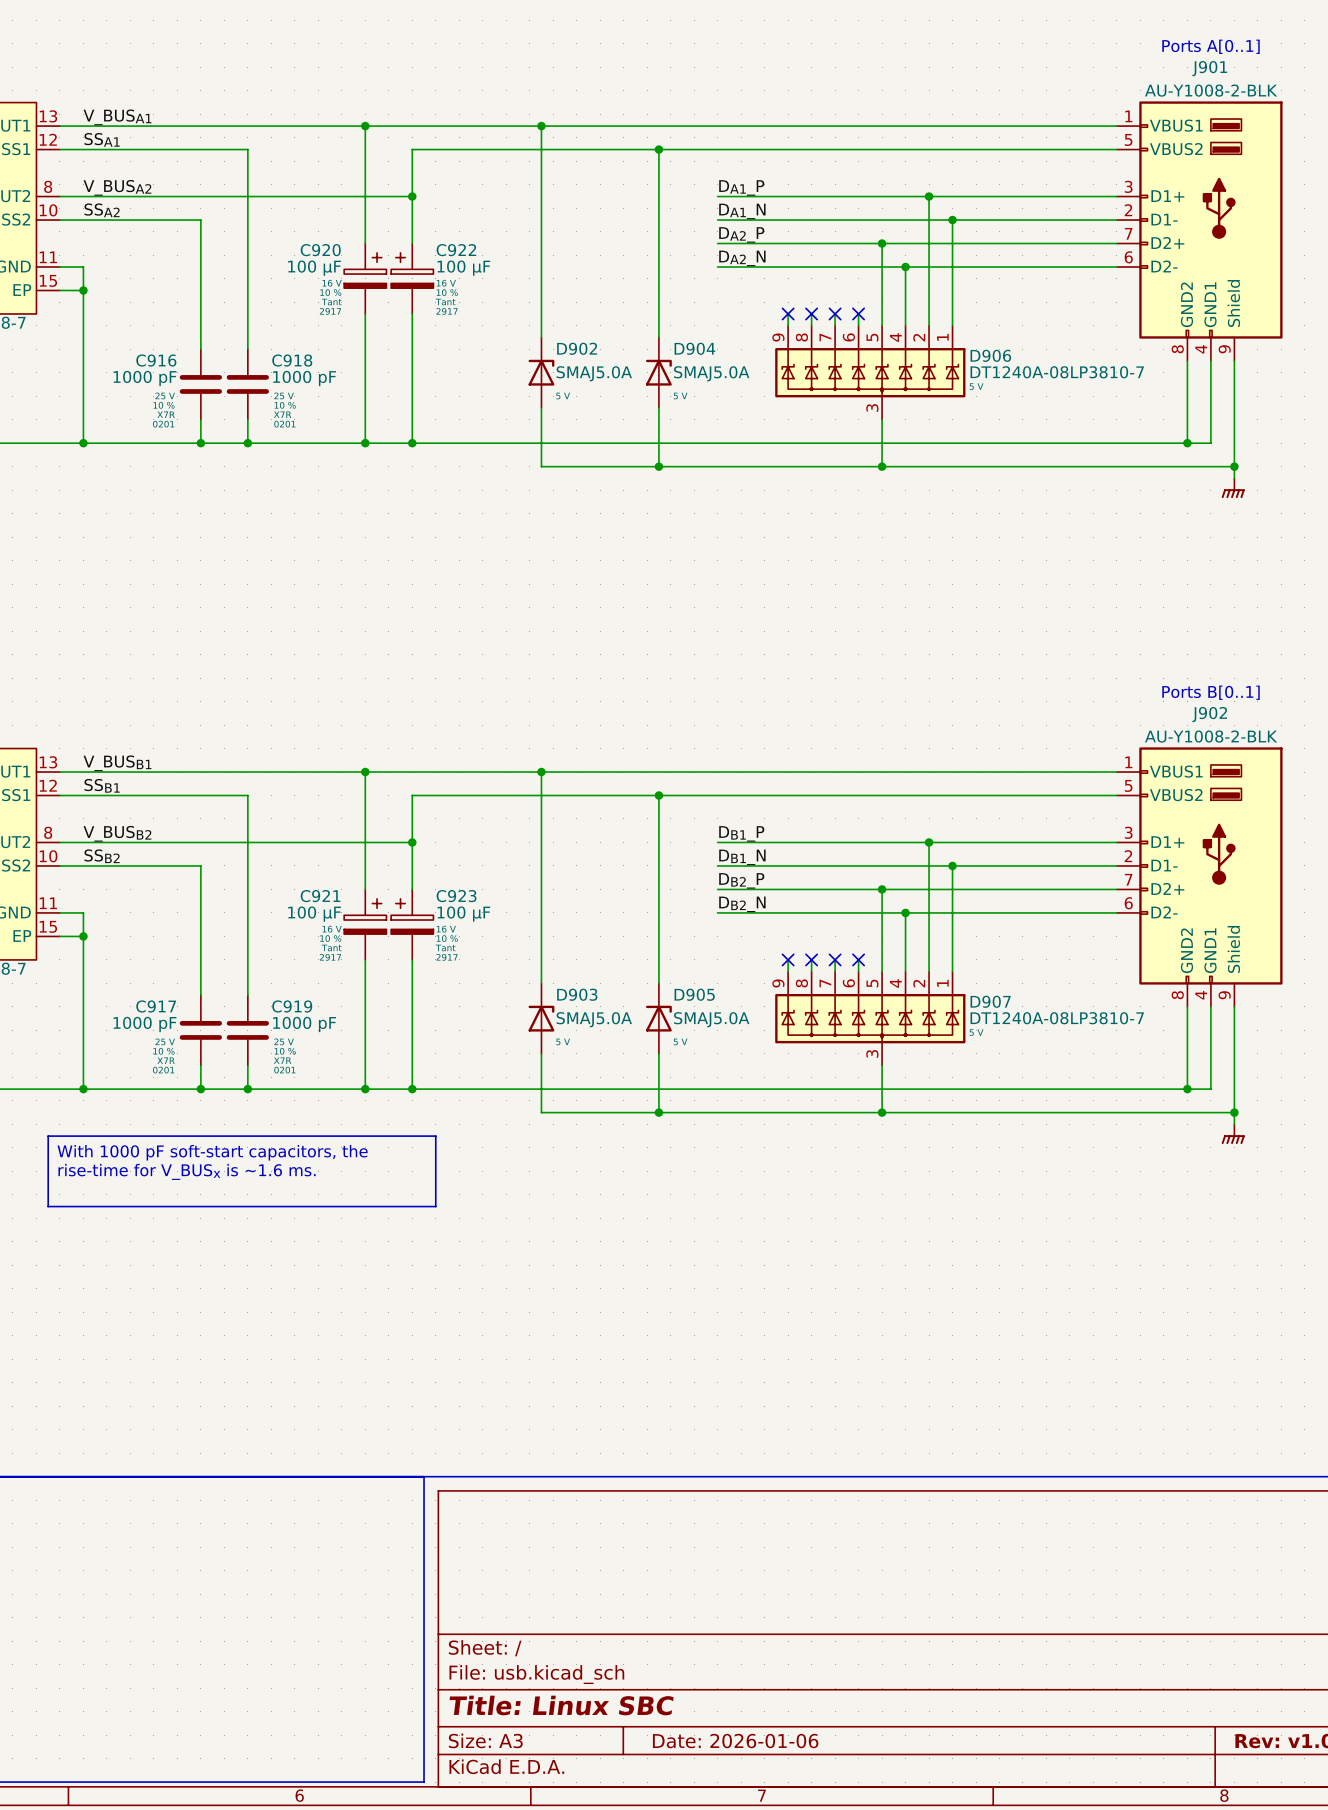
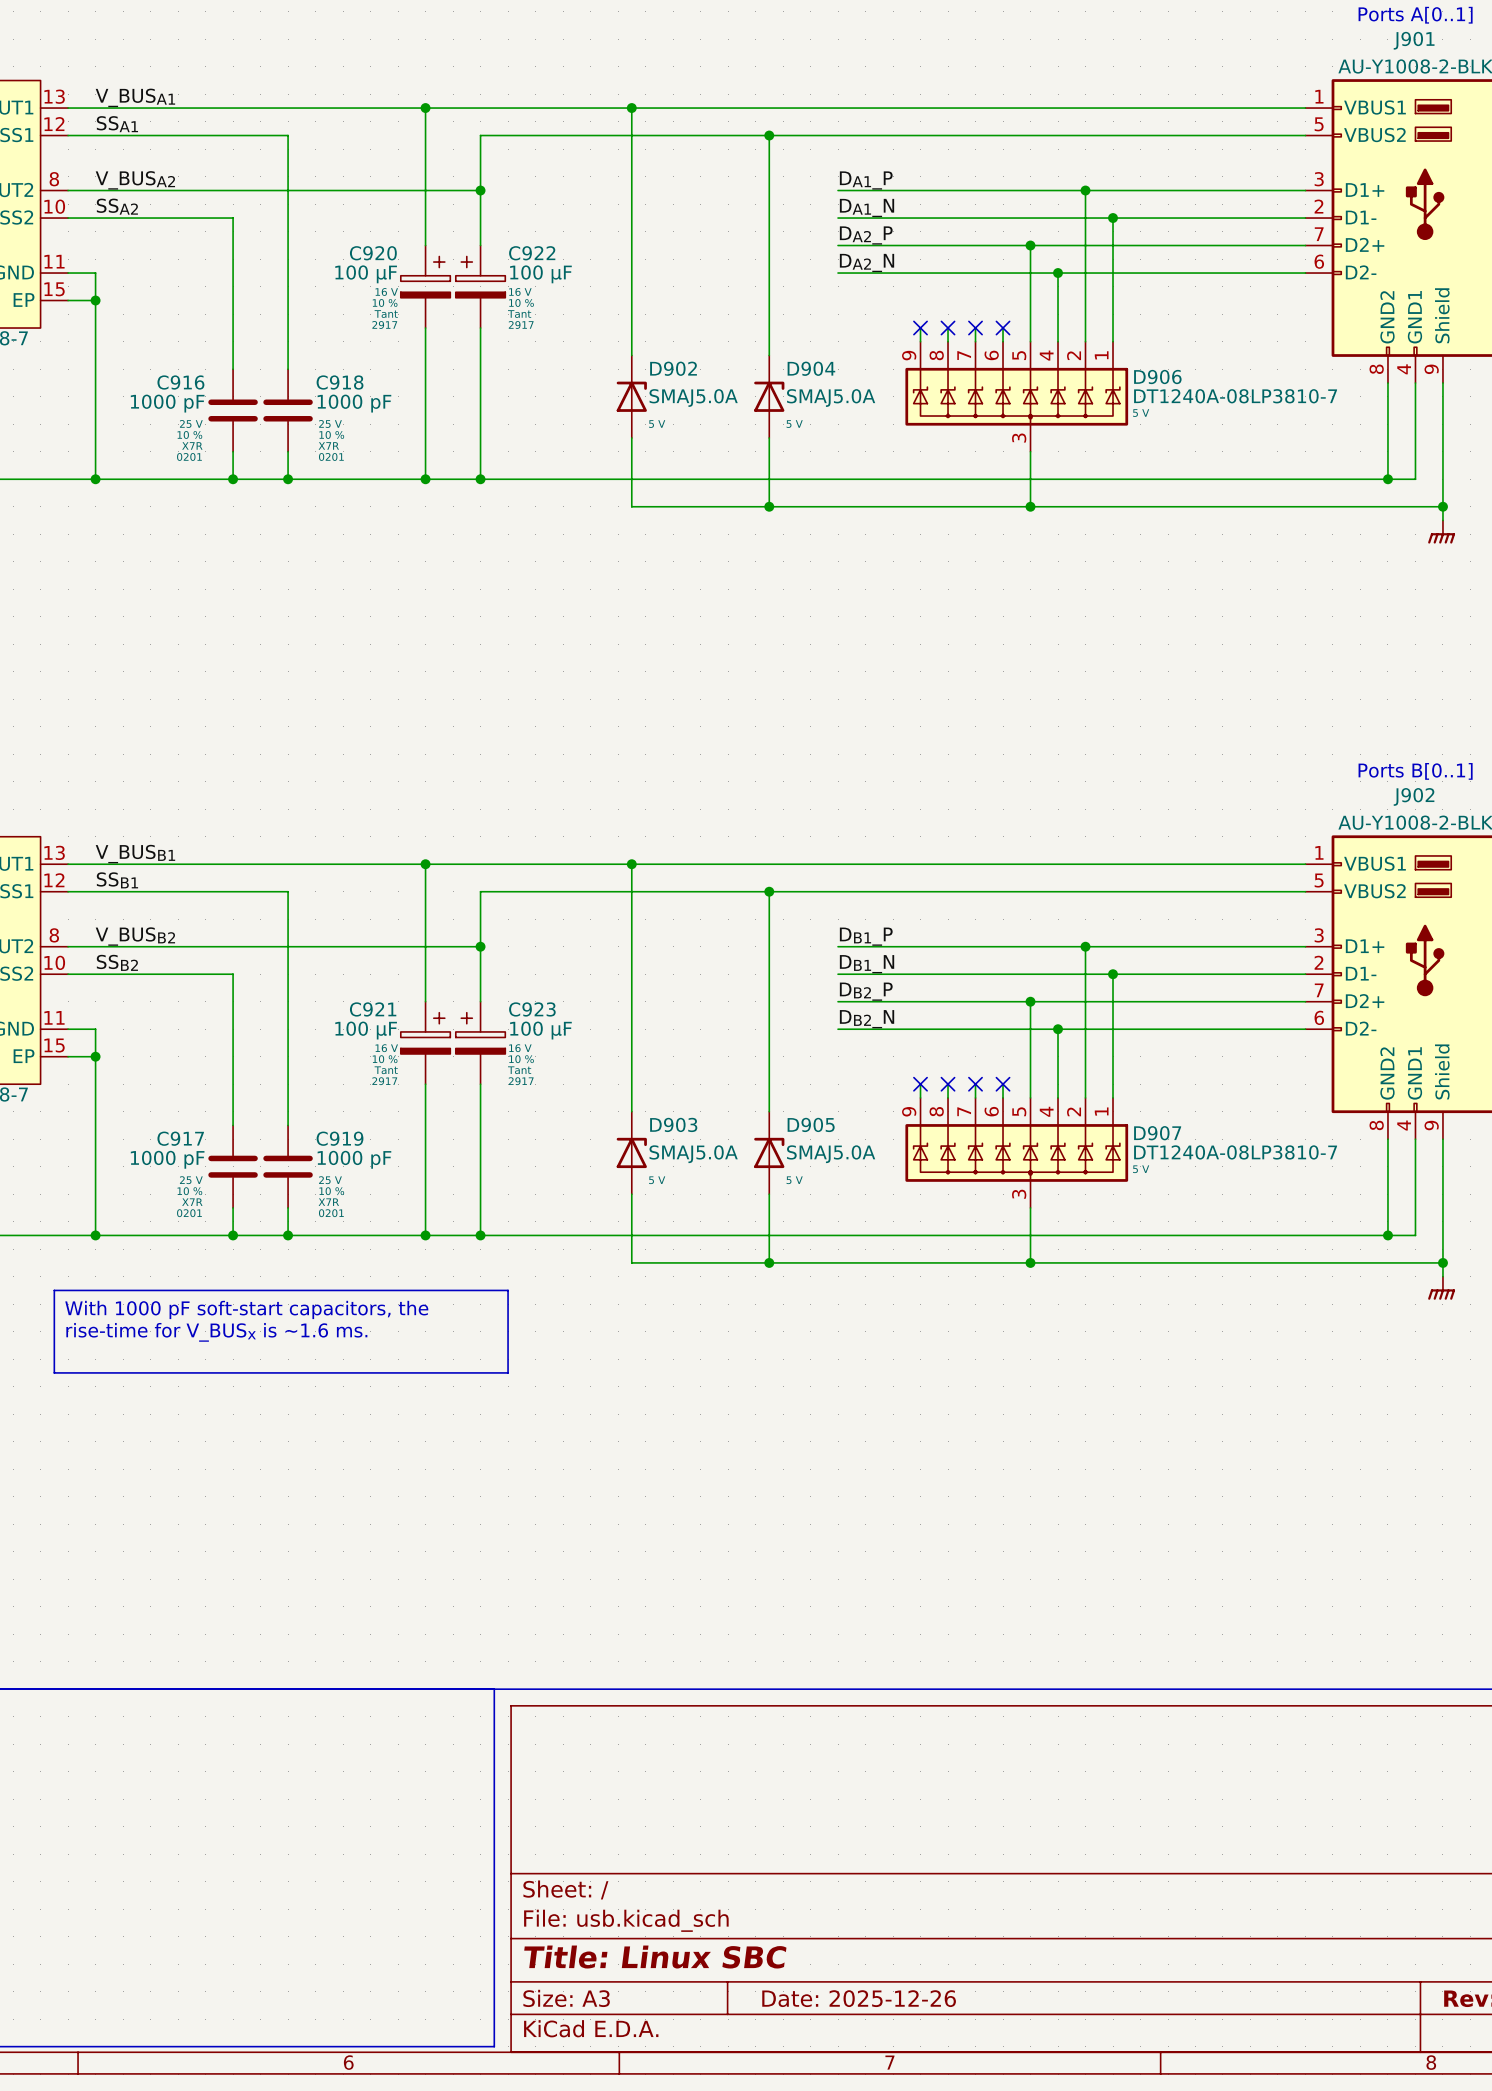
title block: Date: 2026-01-06 (735, 1741) -> Date: 2025-12-26 (859, 1998)

